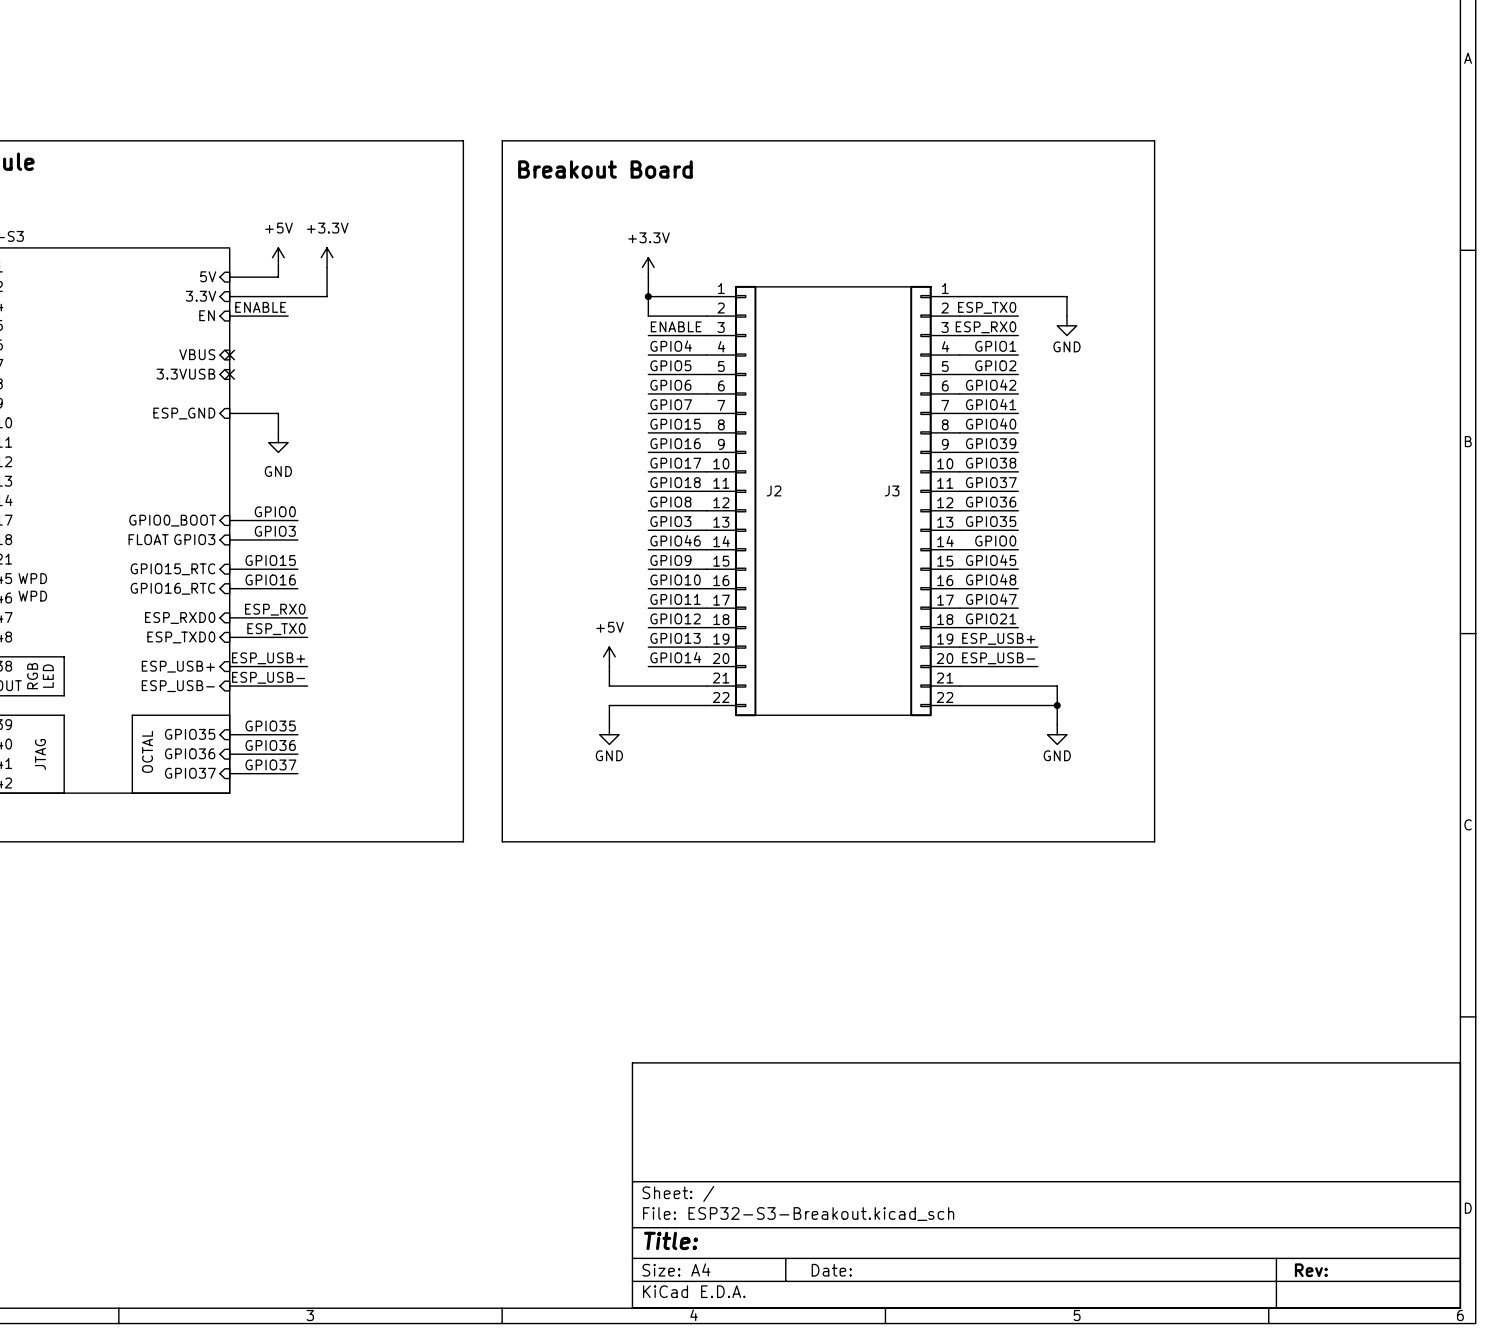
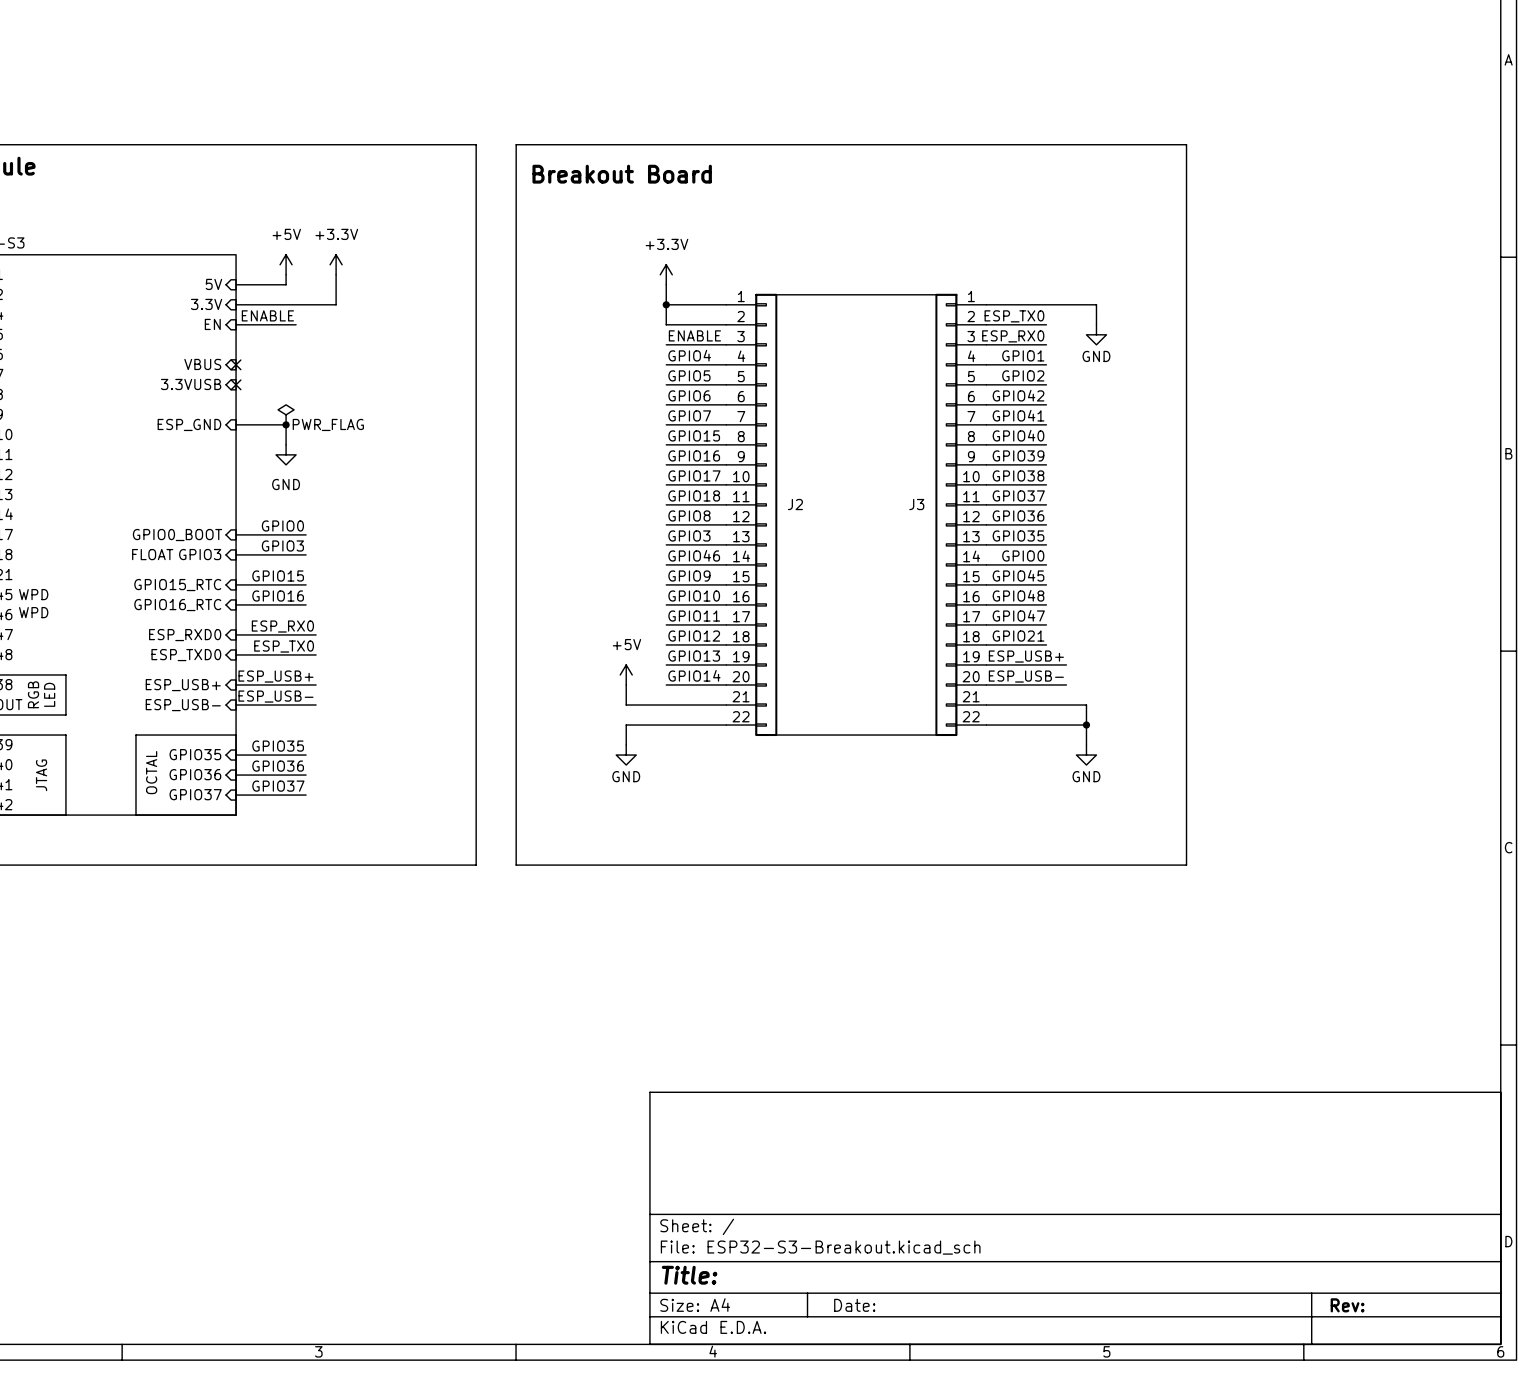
power symbol: none -> PWR_FLAG (286, 414)
junction: none -> (286, 424)

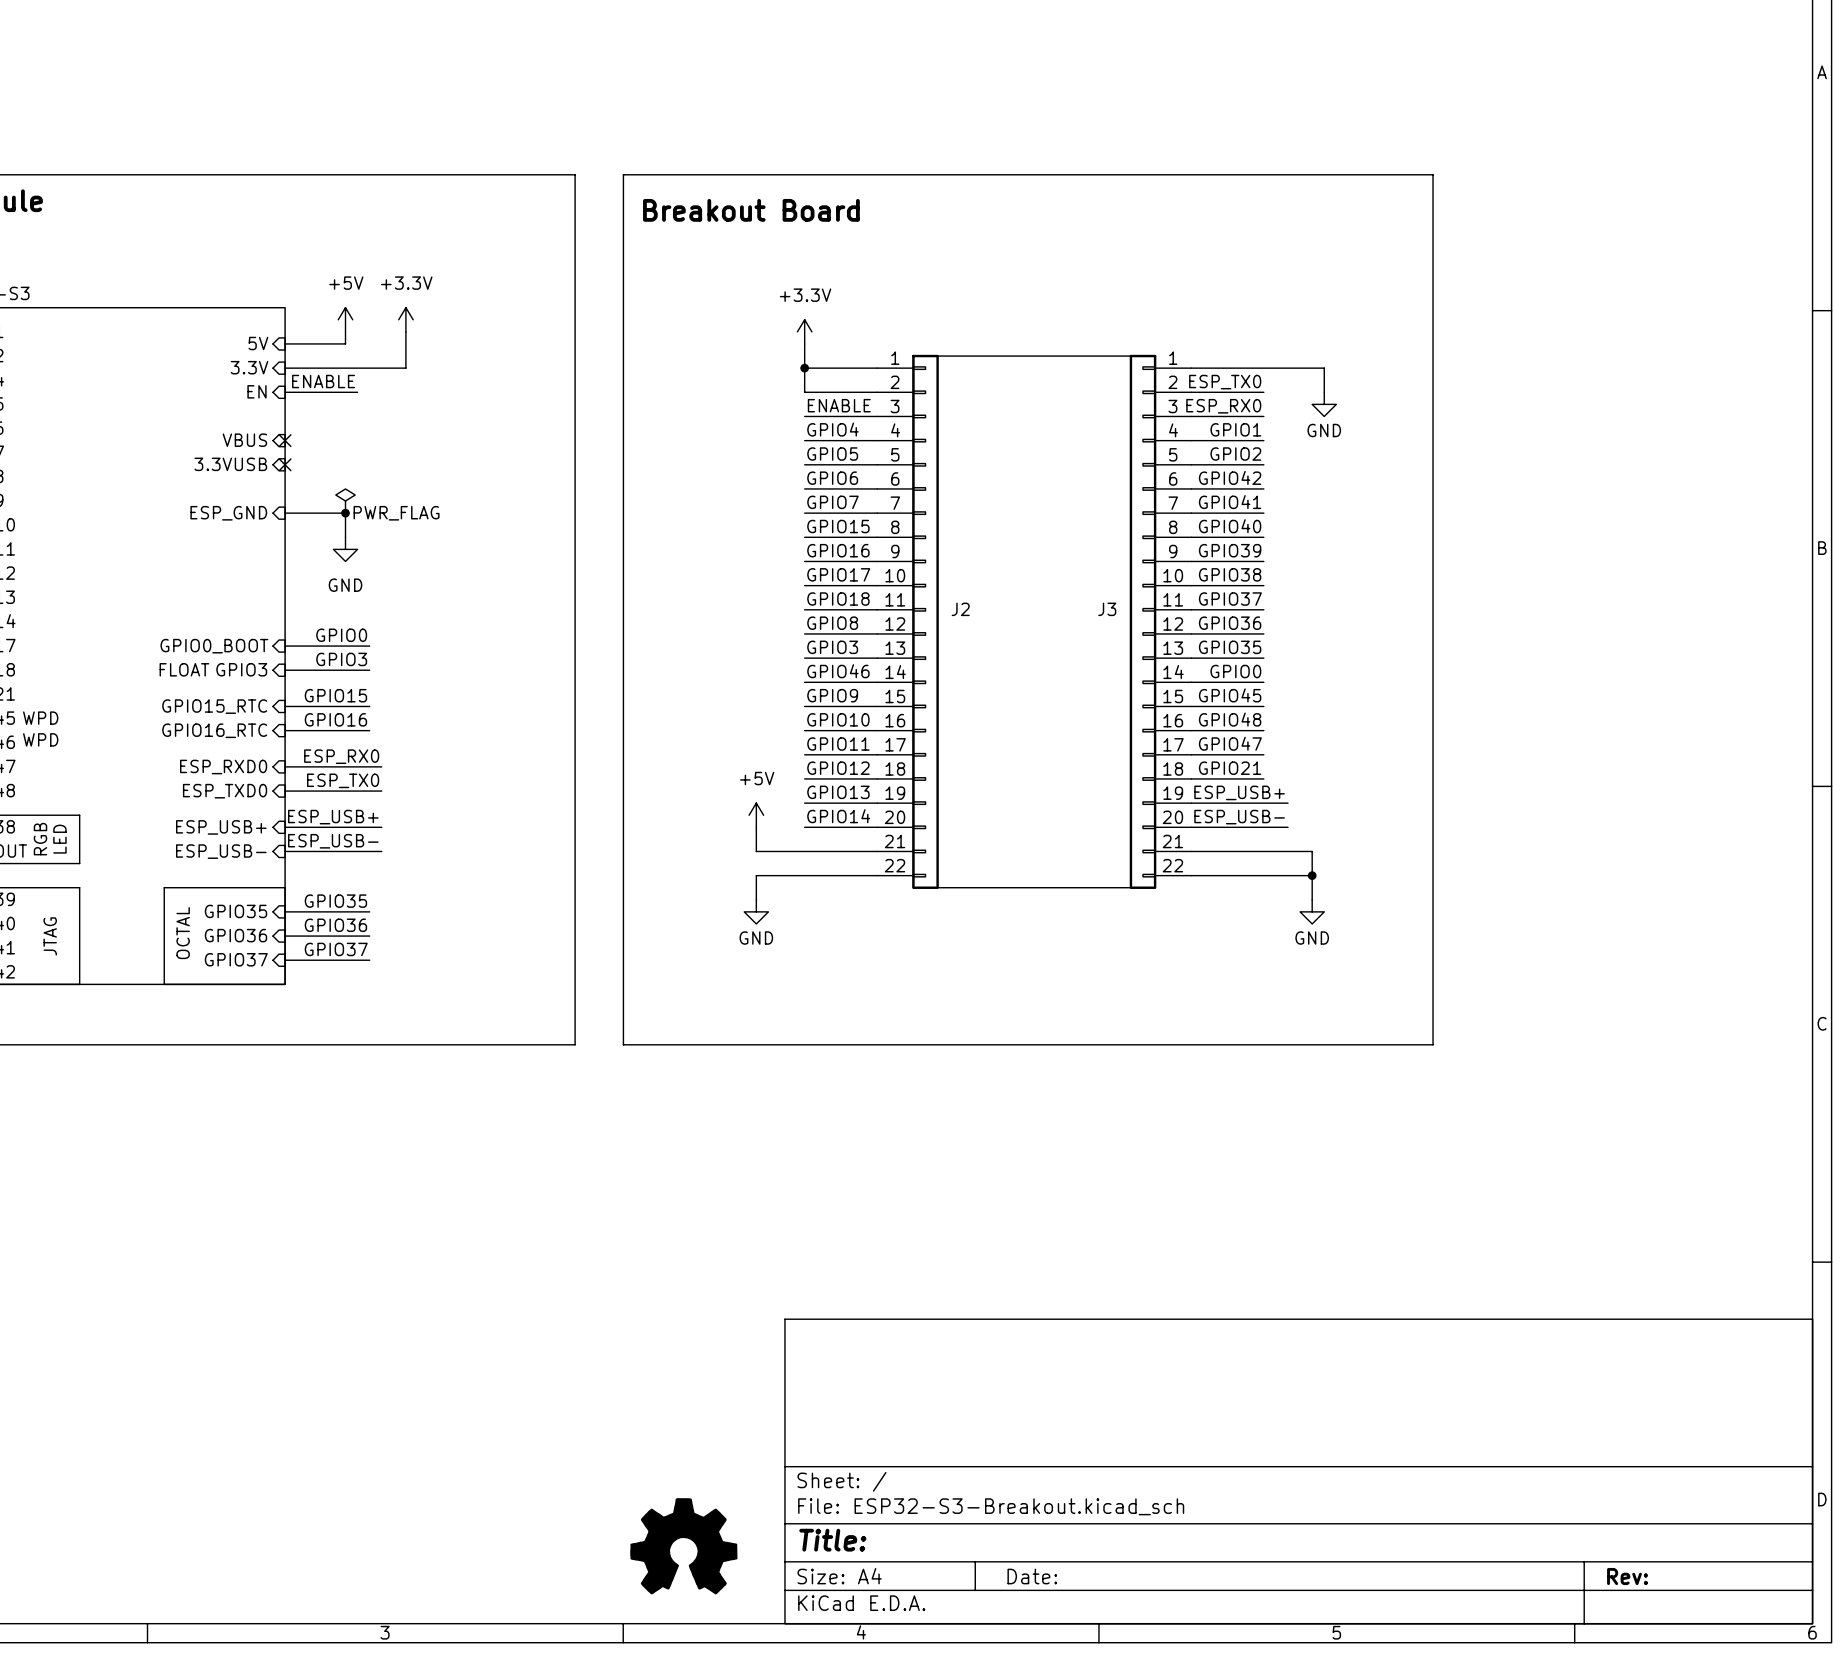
part: none -> (683, 1546)

